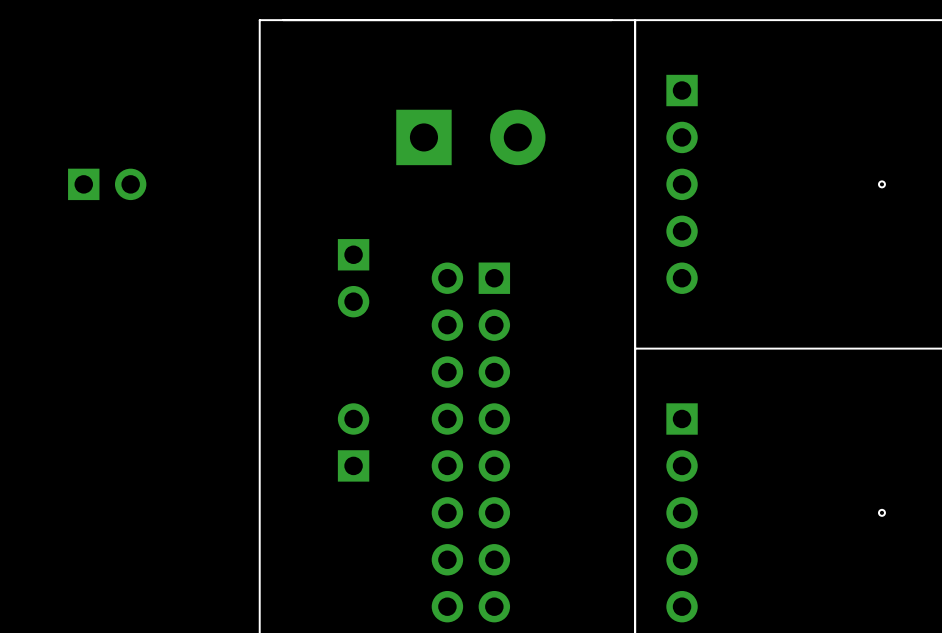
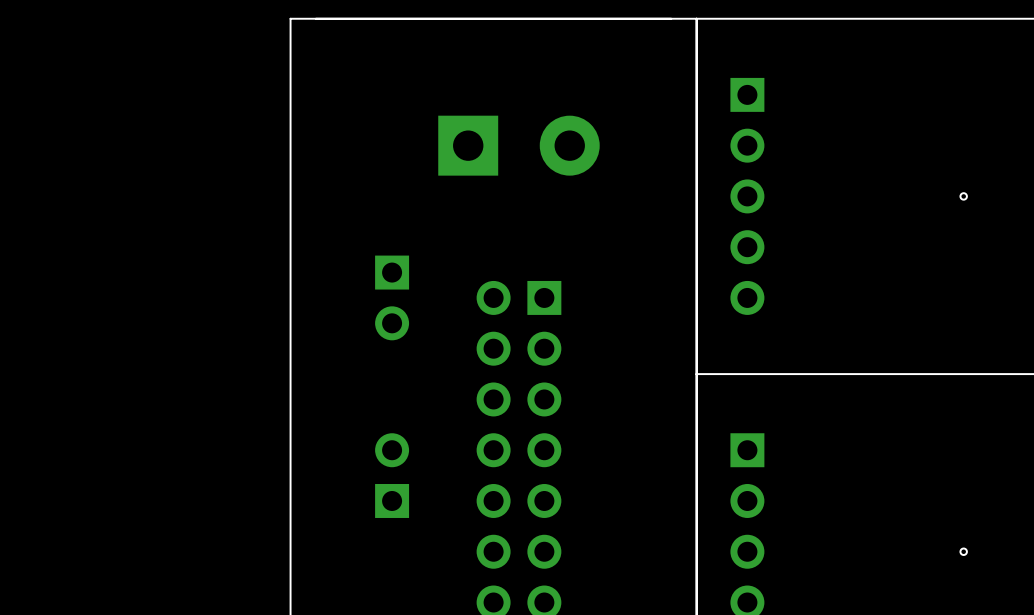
part: (107, 184) -> none

